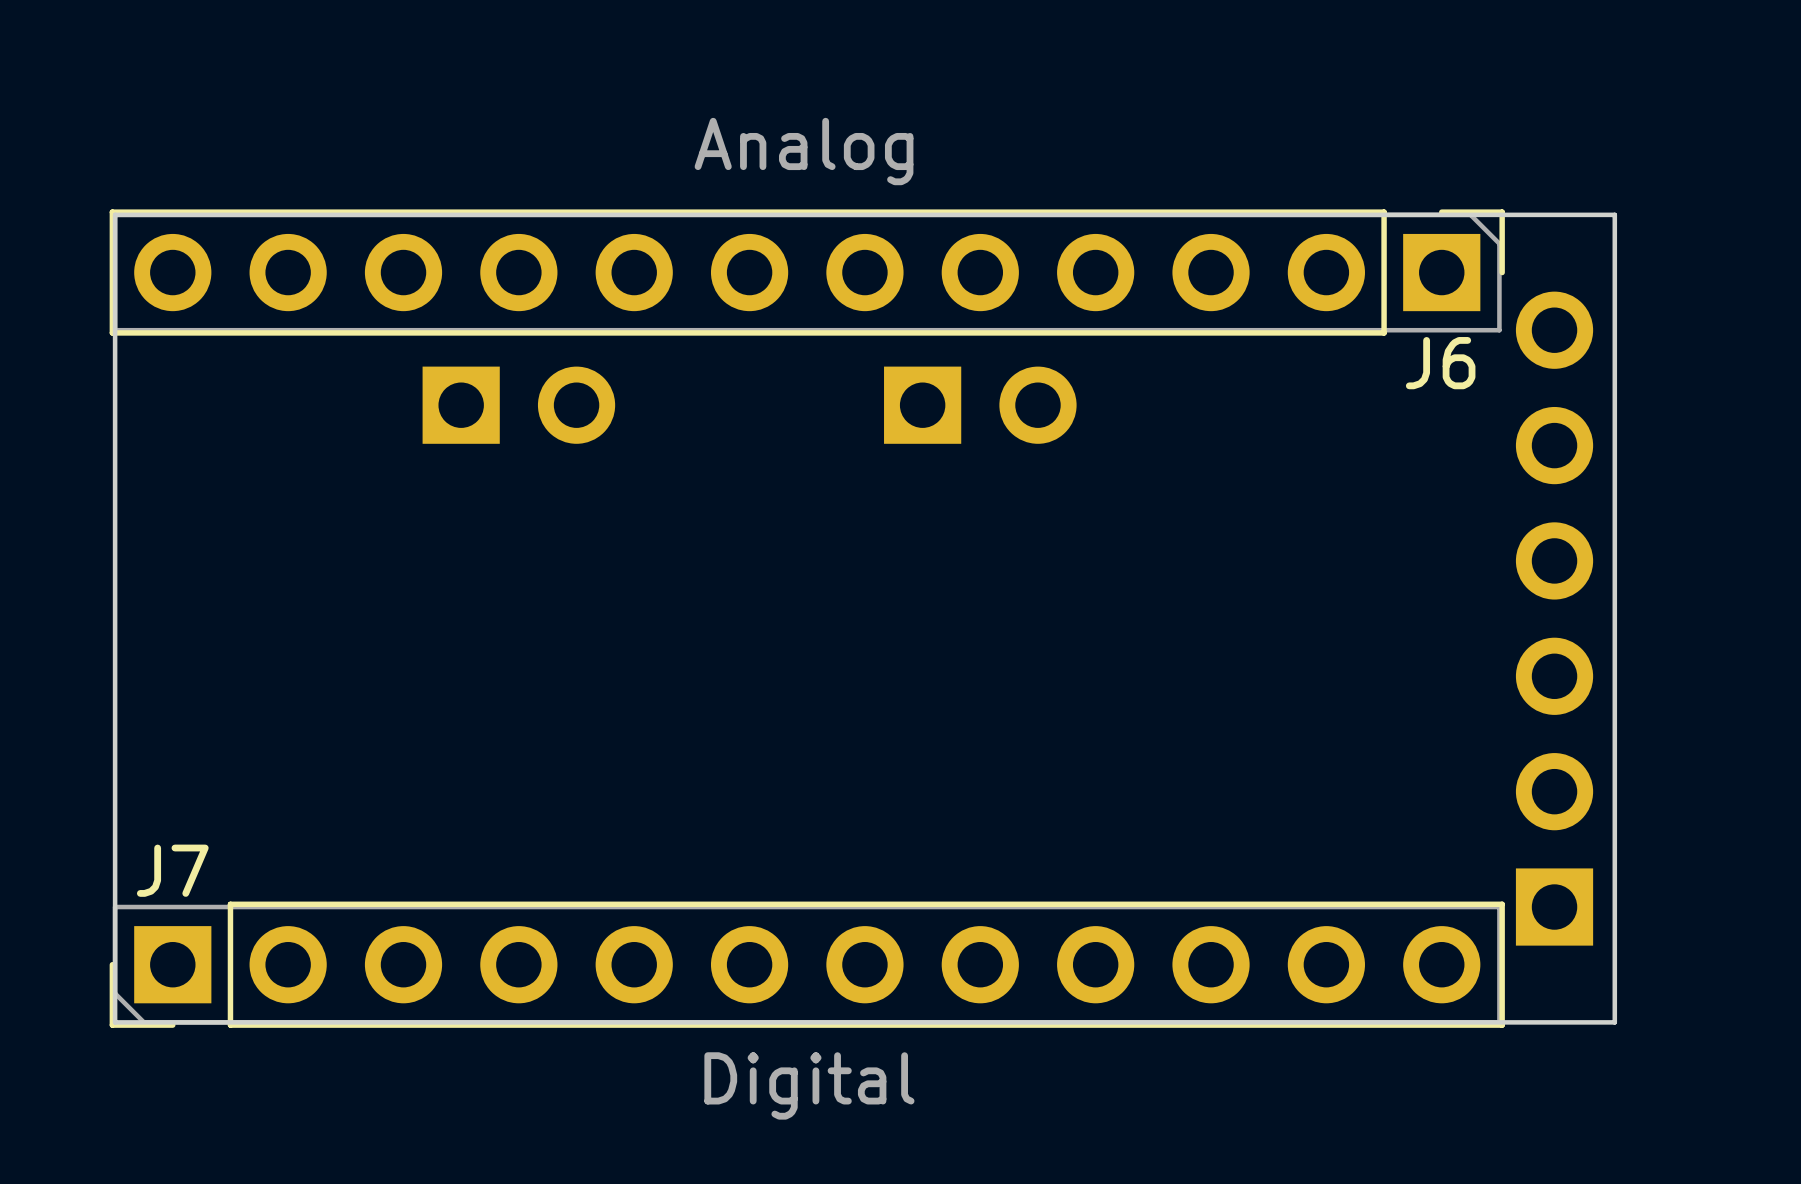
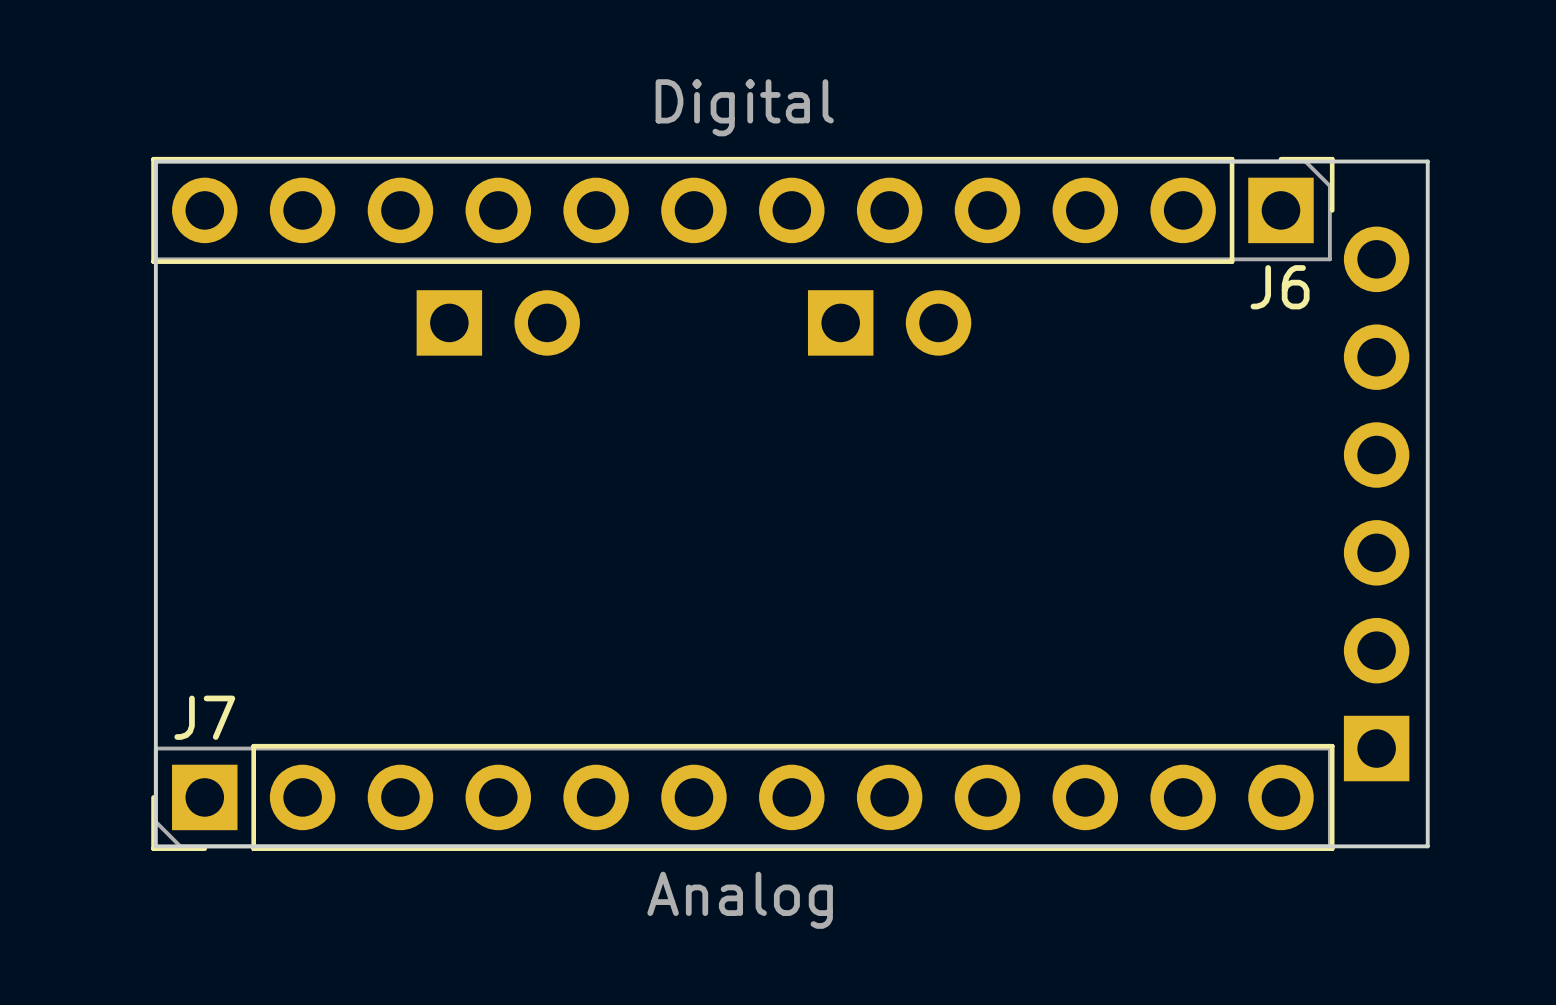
J6 value: Analog (804, 151) -> Digital (744, 107)
J7 value: Digital (809, 1085) -> Analog (740, 900)

